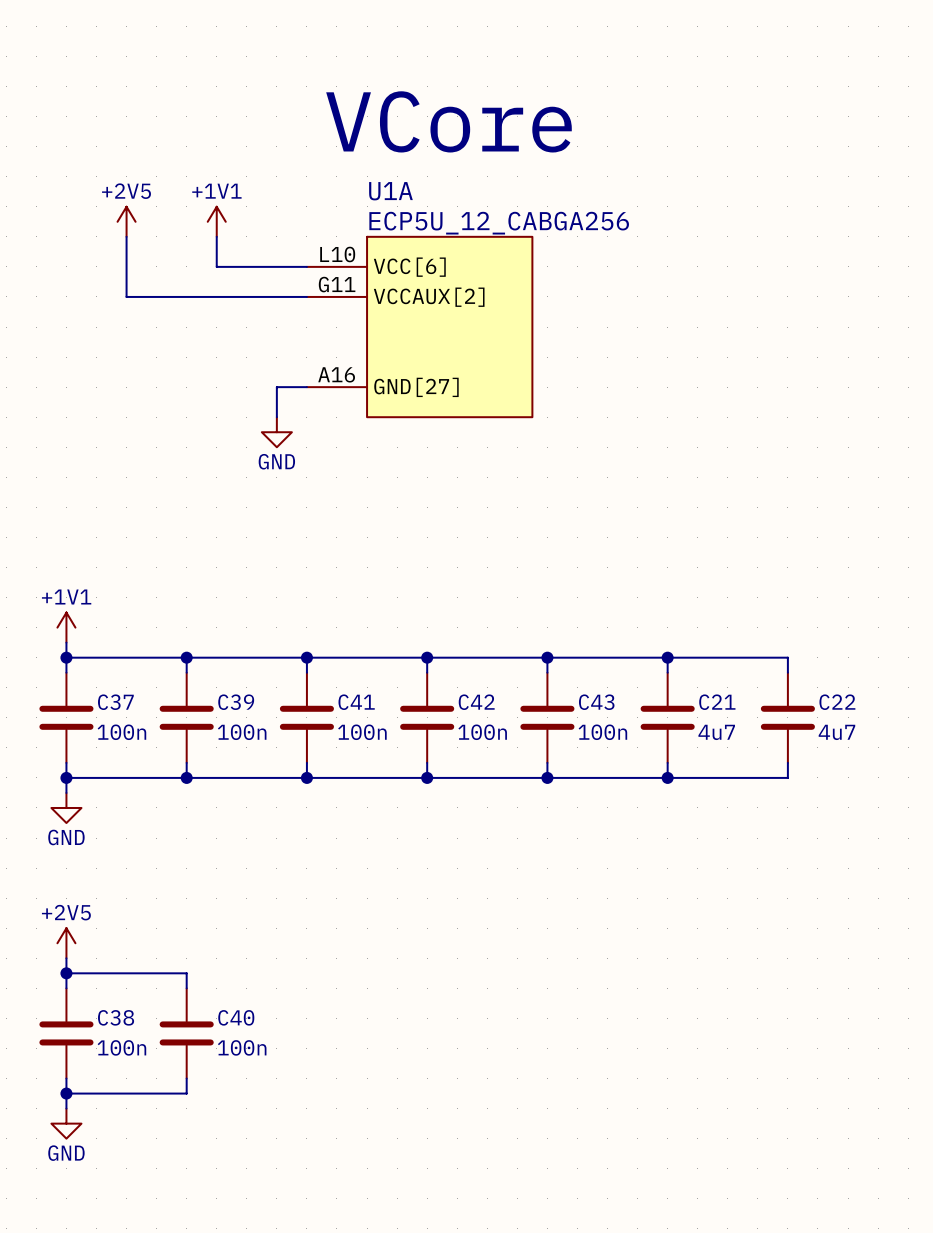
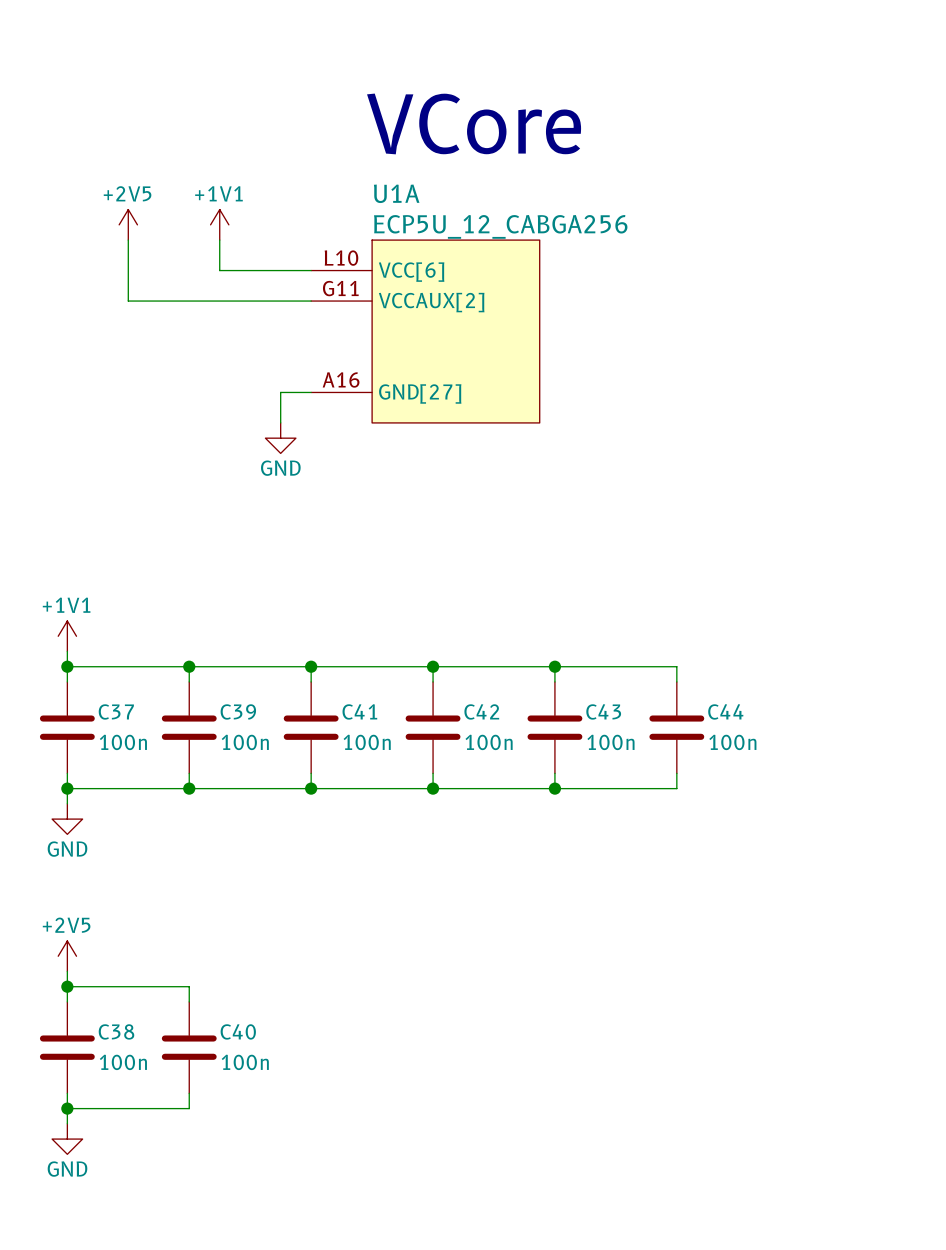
wire: (667, 657) (787, 657) (787, 672) -> none
junction: (667, 657) -> none
C21 name: C21 (717, 702) -> C44 (725, 711)
C22: 4u7 (787, 717) -> none
C21 value: 4u7 (716, 732) -> 100n (732, 742)
wire: (787, 762) (787, 777) (667, 777) -> none
junction: (667, 777) -> none

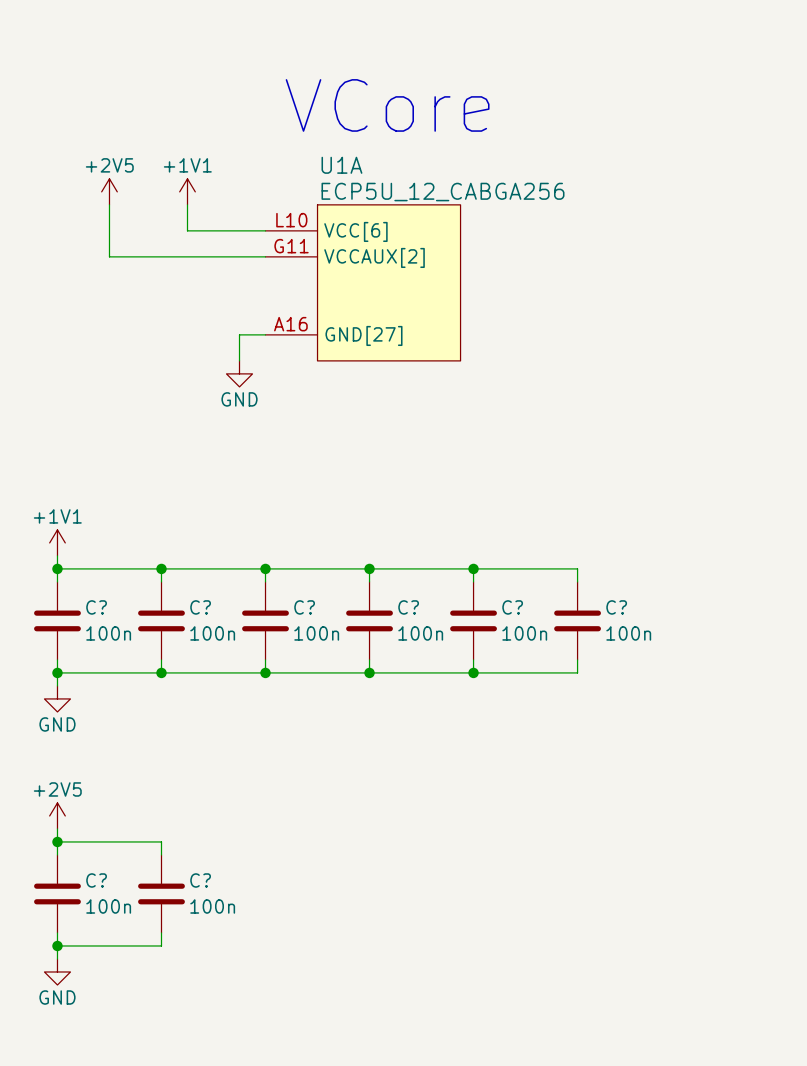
C37 name: C37 (116, 711) -> C? (96, 607)
C39 name: C39 (238, 711) -> C? (200, 607)
C41 name: C41 (359, 711) -> C? (304, 607)
C42 name: C42 (481, 711) -> C? (408, 607)
C43 name: C43 (603, 711) -> C? (512, 607)
C44 name: C44 (725, 711) -> C? (616, 607)
C38 name: C38 (116, 1031) -> C? (96, 880)
C40 name: C40 (238, 1031) -> C? (200, 880)

